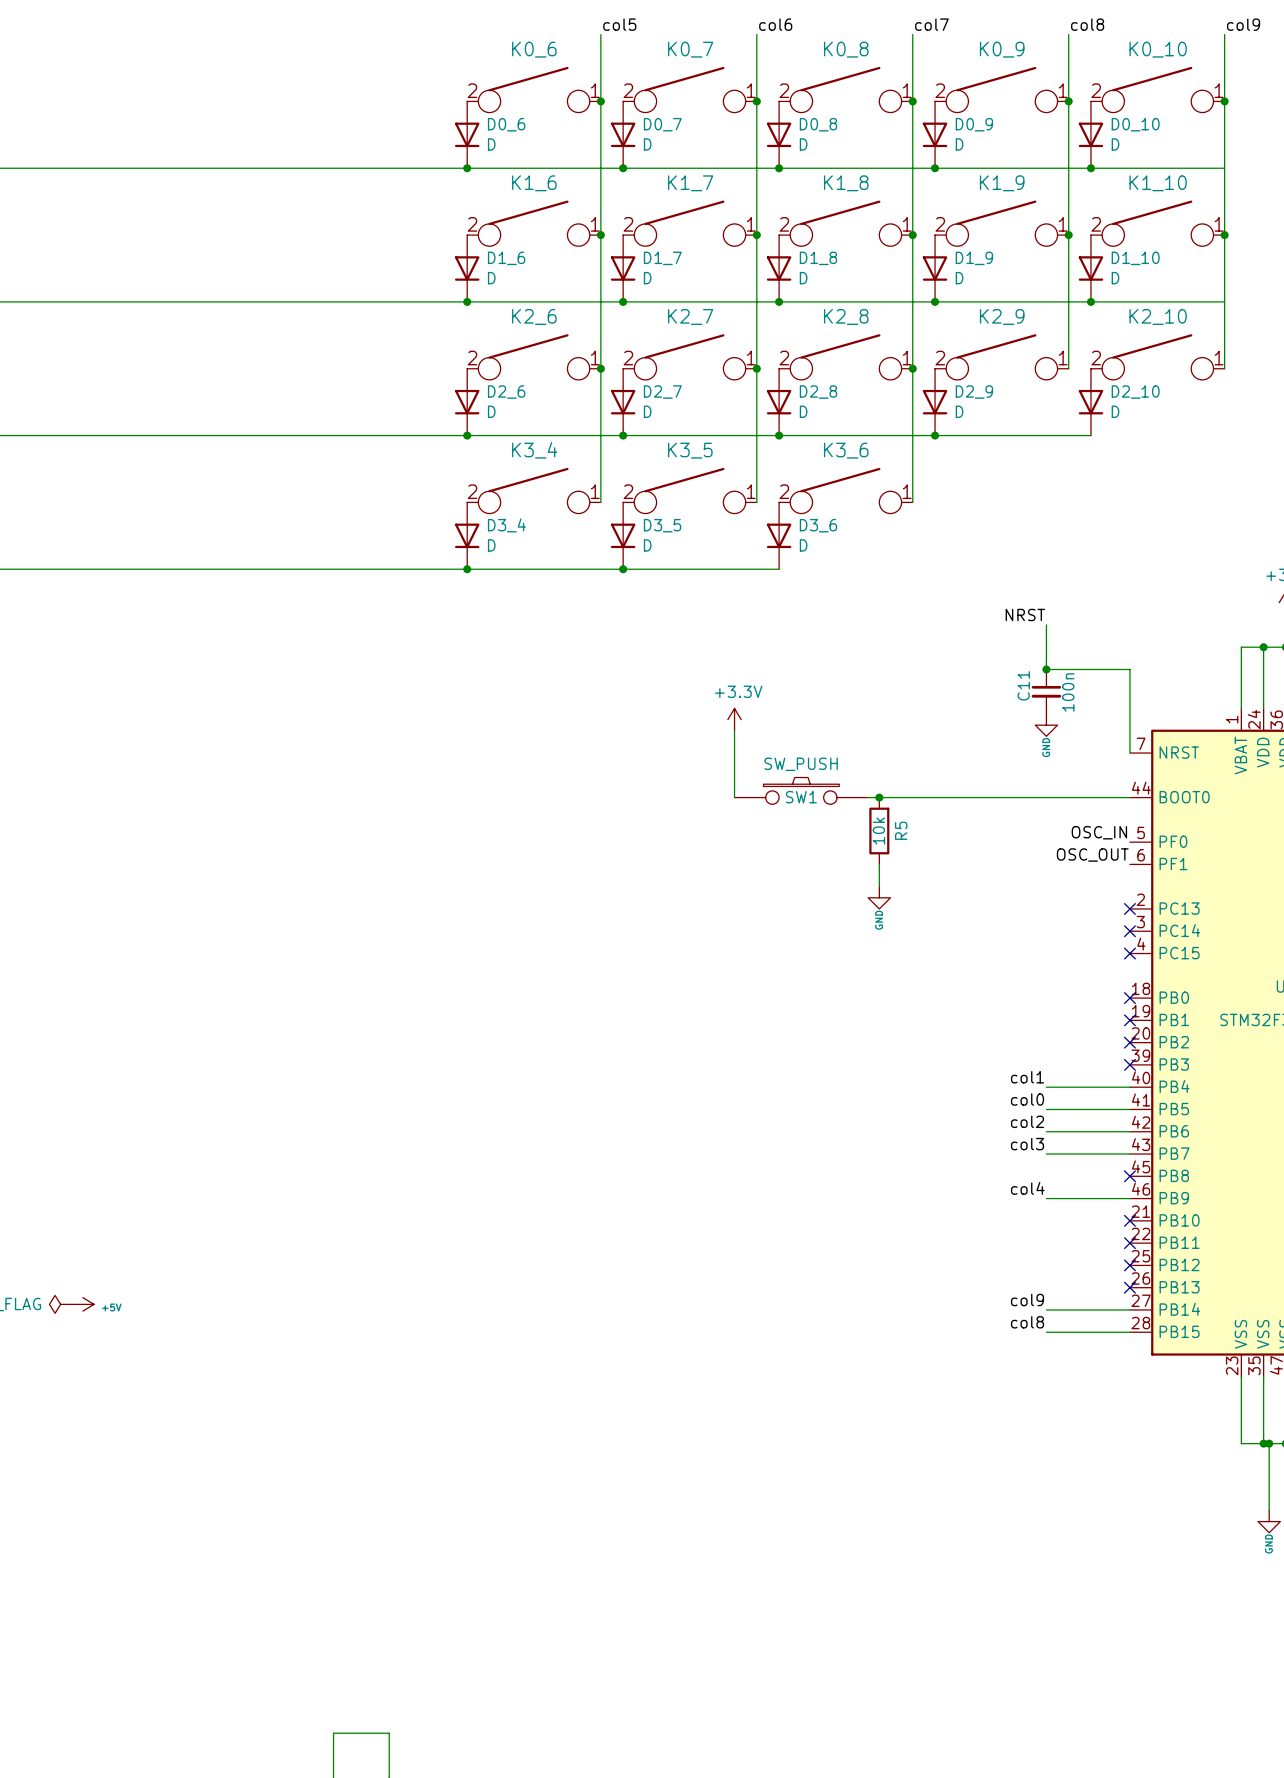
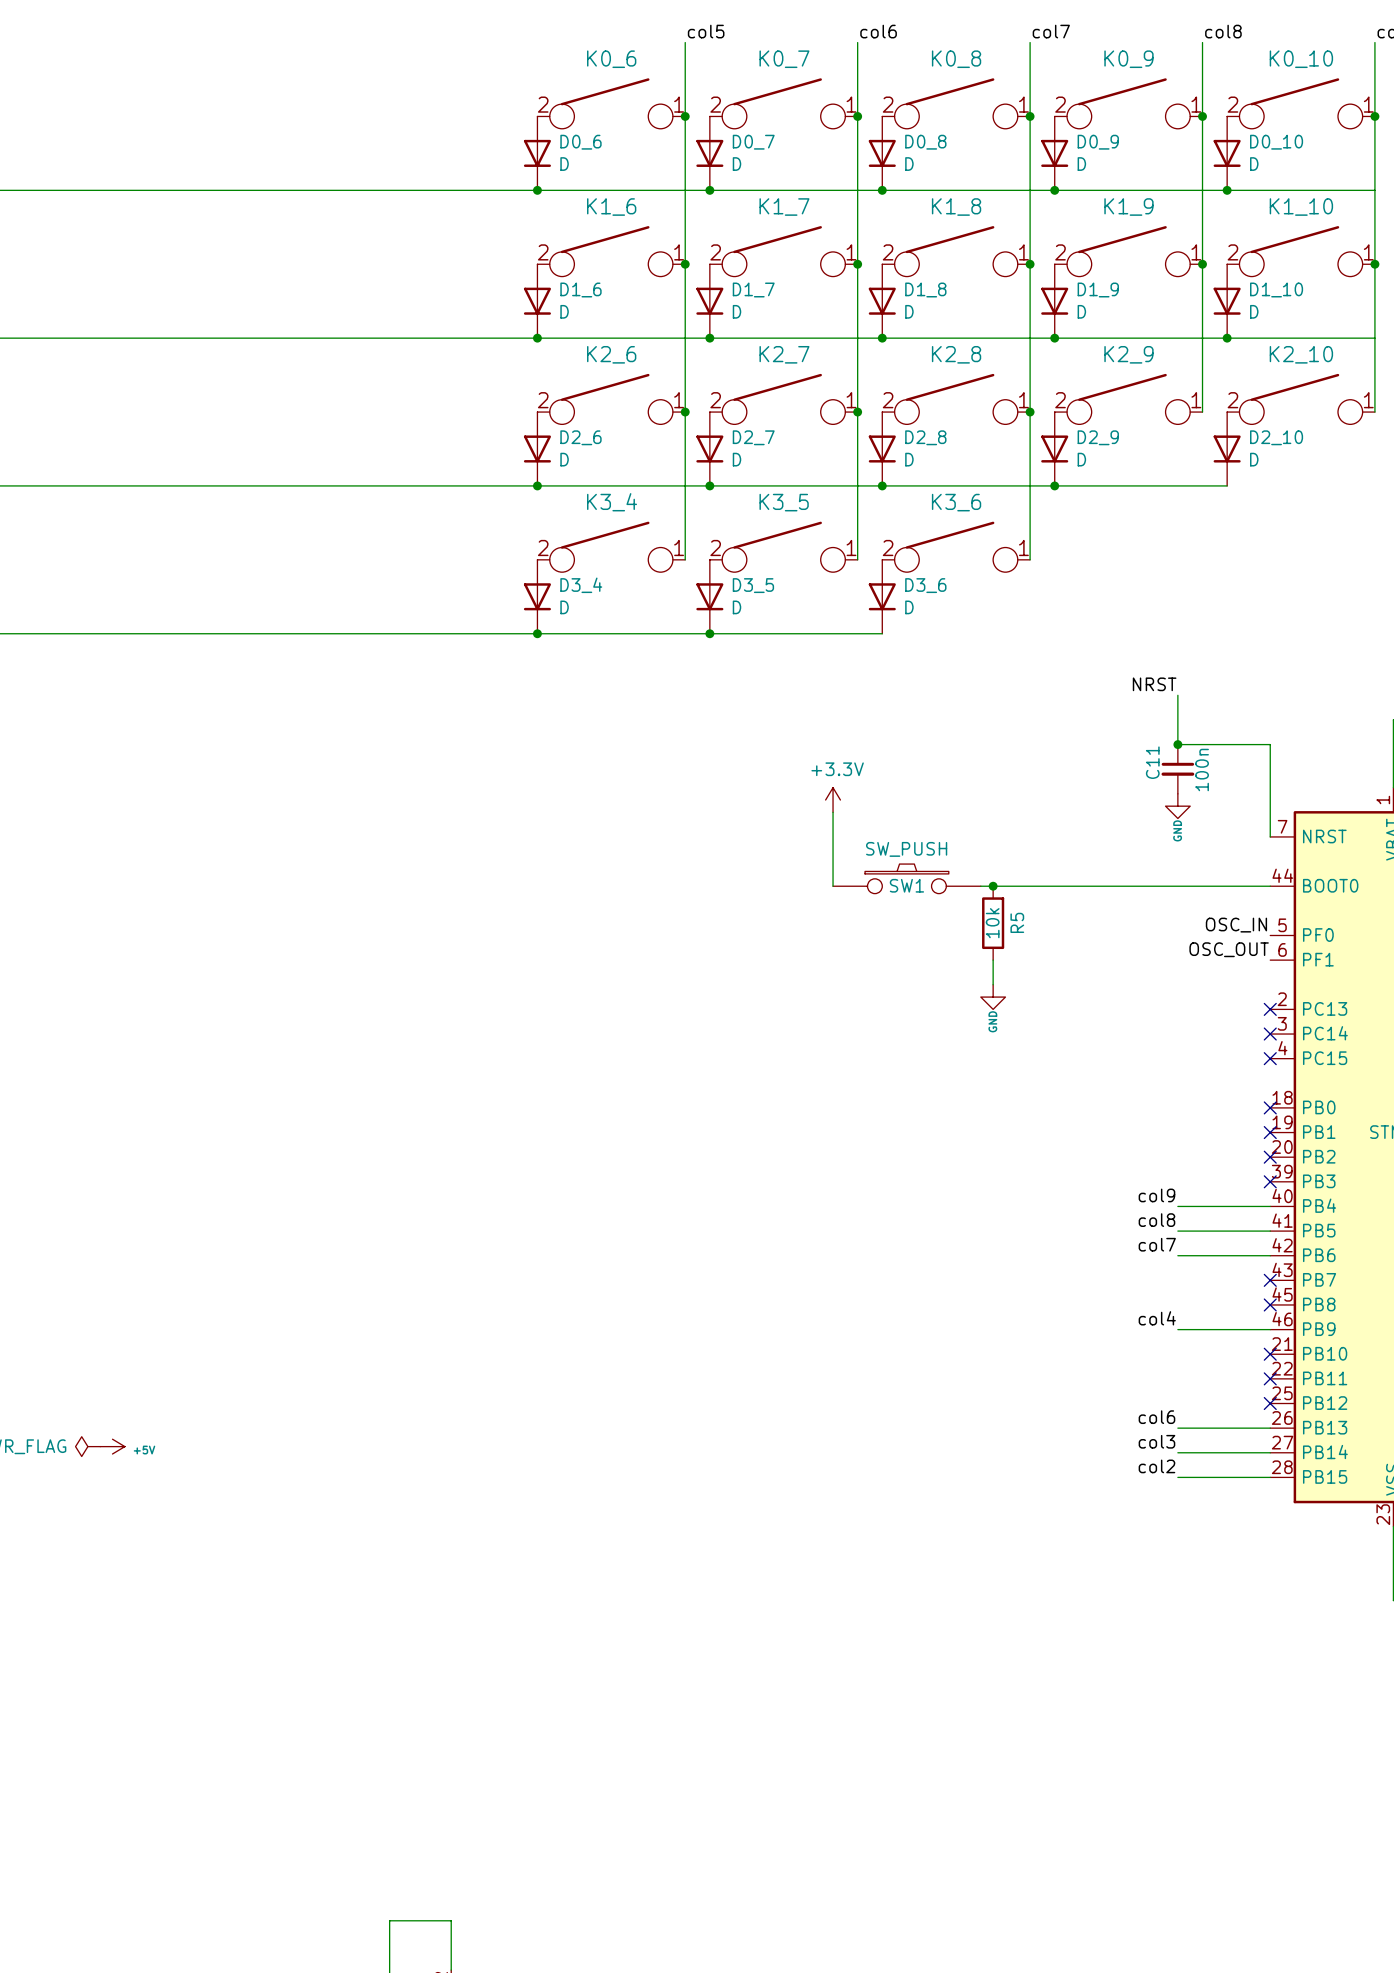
label: col1 (1027, 1077) -> col9 (1156, 1195)
label: col0 (1027, 1099) -> col8 (1156, 1220)
label: col2 (1027, 1121) -> col7 (1157, 1244)
label: col3 (1027, 1144) -> none
wire: (1046, 1154) (1129, 1154) -> (1177, 1428) (1270, 1428)
no-connect mark: none -> (1270, 1280)
label: none -> col6 (1156, 1417)
no-connect mark: (1129, 1287) -> none
label: col9 (1027, 1300) -> col3 (1156, 1441)
label: col8 (1027, 1322) -> col2 (1156, 1466)

